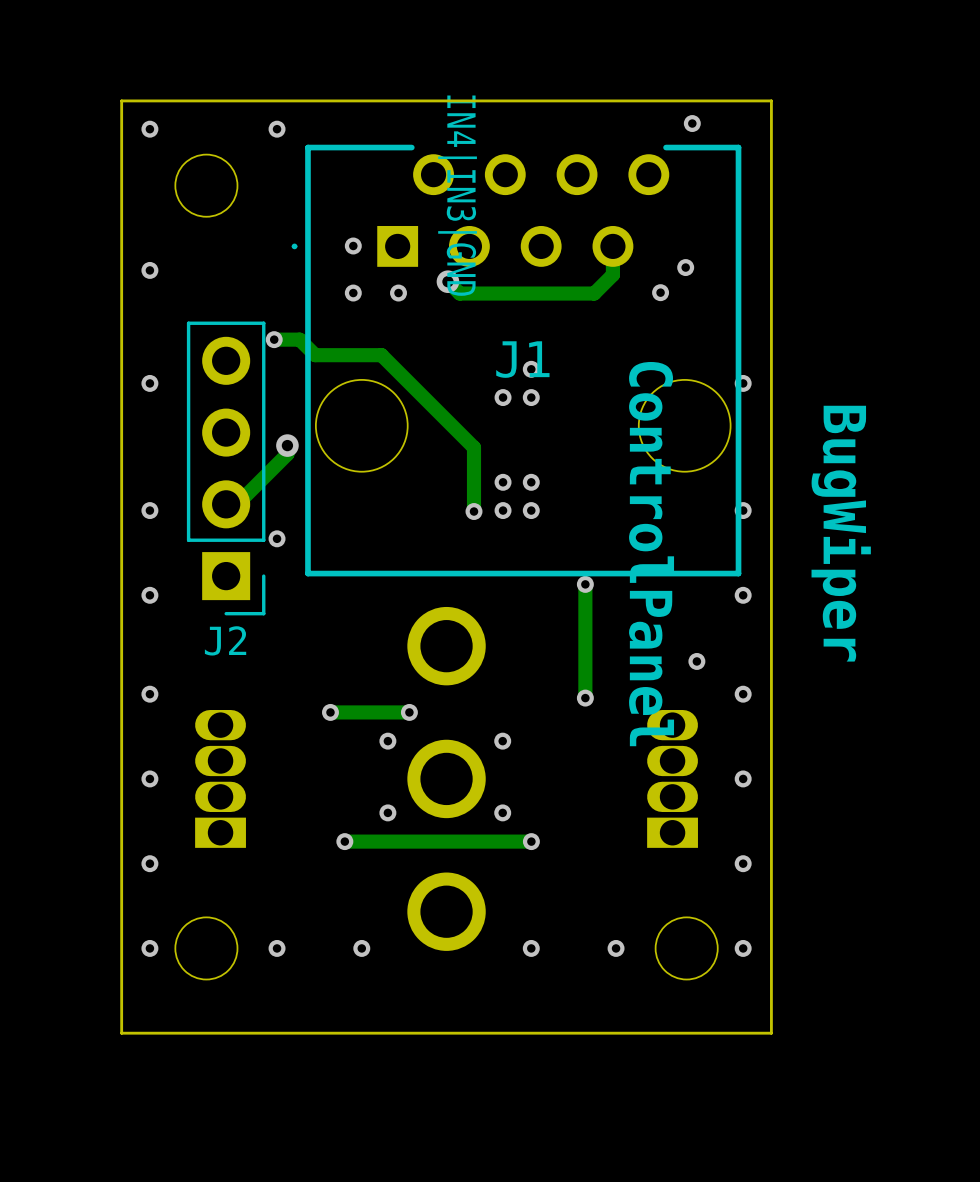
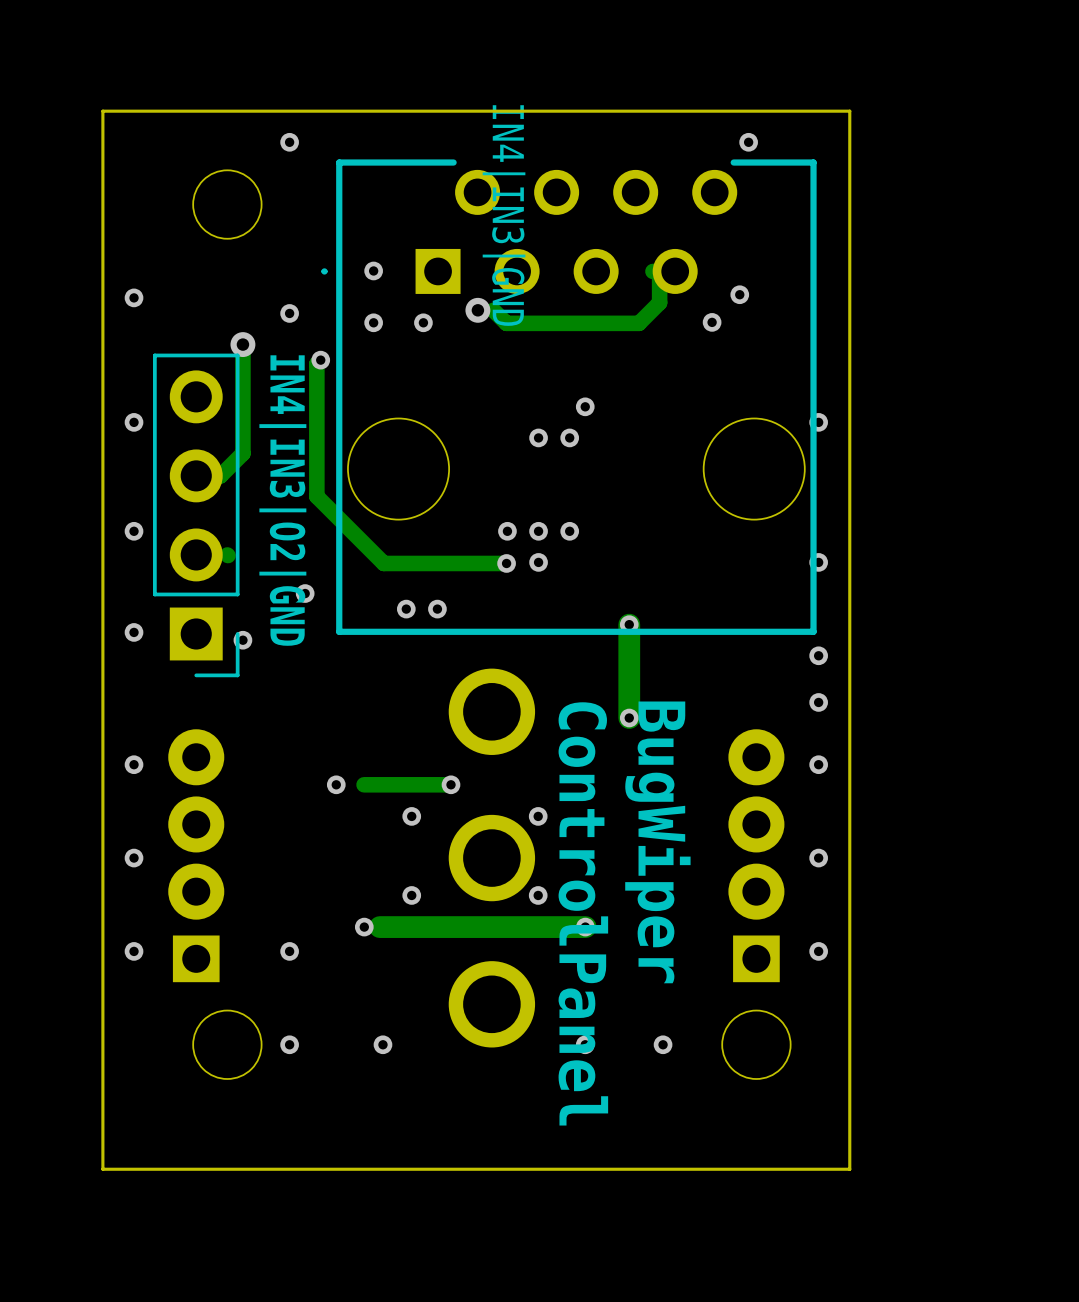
board edge: (121, 100) (121, 1033) (771, 1033) -> (134, 111) (102, 111) (102, 1169) (849, 1169) (849, 1138)
via position: (692, 123) -> (748, 142)
via: (149, 129) -> none
via position: (277, 129) -> (289, 142)
via position: (353, 245) -> (373, 270)
track: (606, 246) (612, 246) (612, 274) (594, 293) (580, 293) -> (652, 271) (659, 271) (659, 302) (639, 323)
via position: (685, 267) -> (739, 294)
via position: (149, 270) -> (134, 297)
via position: (447, 281) -> (477, 310)
via: none -> (289, 313)
via position: (660, 292) -> (712, 322)
via position: (353, 293) -> (373, 322)
via position: (398, 293) -> (423, 322)
track: none -> (242, 344) (242, 453) (220, 475) (196, 475)
via: none -> (242, 344)
track: none -> (320, 360) (316, 364) (316, 496) (383, 563) (506, 563)
track: (274, 339) (299, 339) (315, 355) (381, 355) (474, 447) (474, 511) -> none
via position: (274, 339) -> (320, 360)
J1 name: J1 (522, 359) -> none
via position: (149, 383) -> (134, 422)
via: none -> (538, 437)
via: (503, 397) -> none
via: none -> (569, 437)
via: (531, 397) -> none
track: (287, 445) (287, 454) (237, 504) (226, 504) -> none
via: (287, 445) -> none
text: none -> IN4|IN3|O2|GND (282, 500)
part: none -> (196, 515)
J2: (226, 468) -> none
via: none -> (134, 531)
via: none -> (507, 531)
via: none -> (538, 531)
via: (503, 482) -> none
via: none -> (569, 531)
via: (531, 482) -> none
track: none -> (227, 554) (228, 555)
via: (149, 510) -> none
via: none -> (538, 562)
via: (503, 510) -> none
via: (531, 510) -> none
via: none -> (506, 563)
via: (474, 511) -> none
text position: BugWiper (841, 533) -> BugWiper (657, 842)
via: none -> (406, 609)
via: none -> (437, 609)
text position: ControlPanel (651, 554) -> ControlPanel (583, 913)
track: none -> (629, 624) (629, 718)
via: none -> (134, 632)
track: (585, 584) (585, 698) -> none
via position: (585, 584) -> (629, 624)
via: (149, 595) -> none
via: none -> (629, 718)
via position: (696, 661) -> (818, 702)
via position: (149, 694) -> (134, 764)
via: (585, 698) -> none
part footprint: [647, 710, 698, 848] -> [728, 729, 785, 983]
via position: (330, 712) -> (336, 784)
via position: (387, 741) -> (411, 816)
via position: (502, 741) -> (538, 816)
part: none -> (196, 855)
via position: (149, 778) -> (134, 858)
part: (220, 778) -> none
via position: (387, 812) -> (411, 895)
via position: (502, 812) -> (538, 895)
via position: (344, 841) -> (364, 927)
track width: thin (531, 841) (344, 841) -> thick (585, 927) (379, 927)
via position: (149, 863) -> (134, 951)
via: none -> (289, 951)
via: (149, 948) -> none
via position: (277, 948) -> (289, 1044)
via position: (361, 948) -> (382, 1044)
via position: (616, 948) -> (663, 1044)
via: (743, 948) -> none

